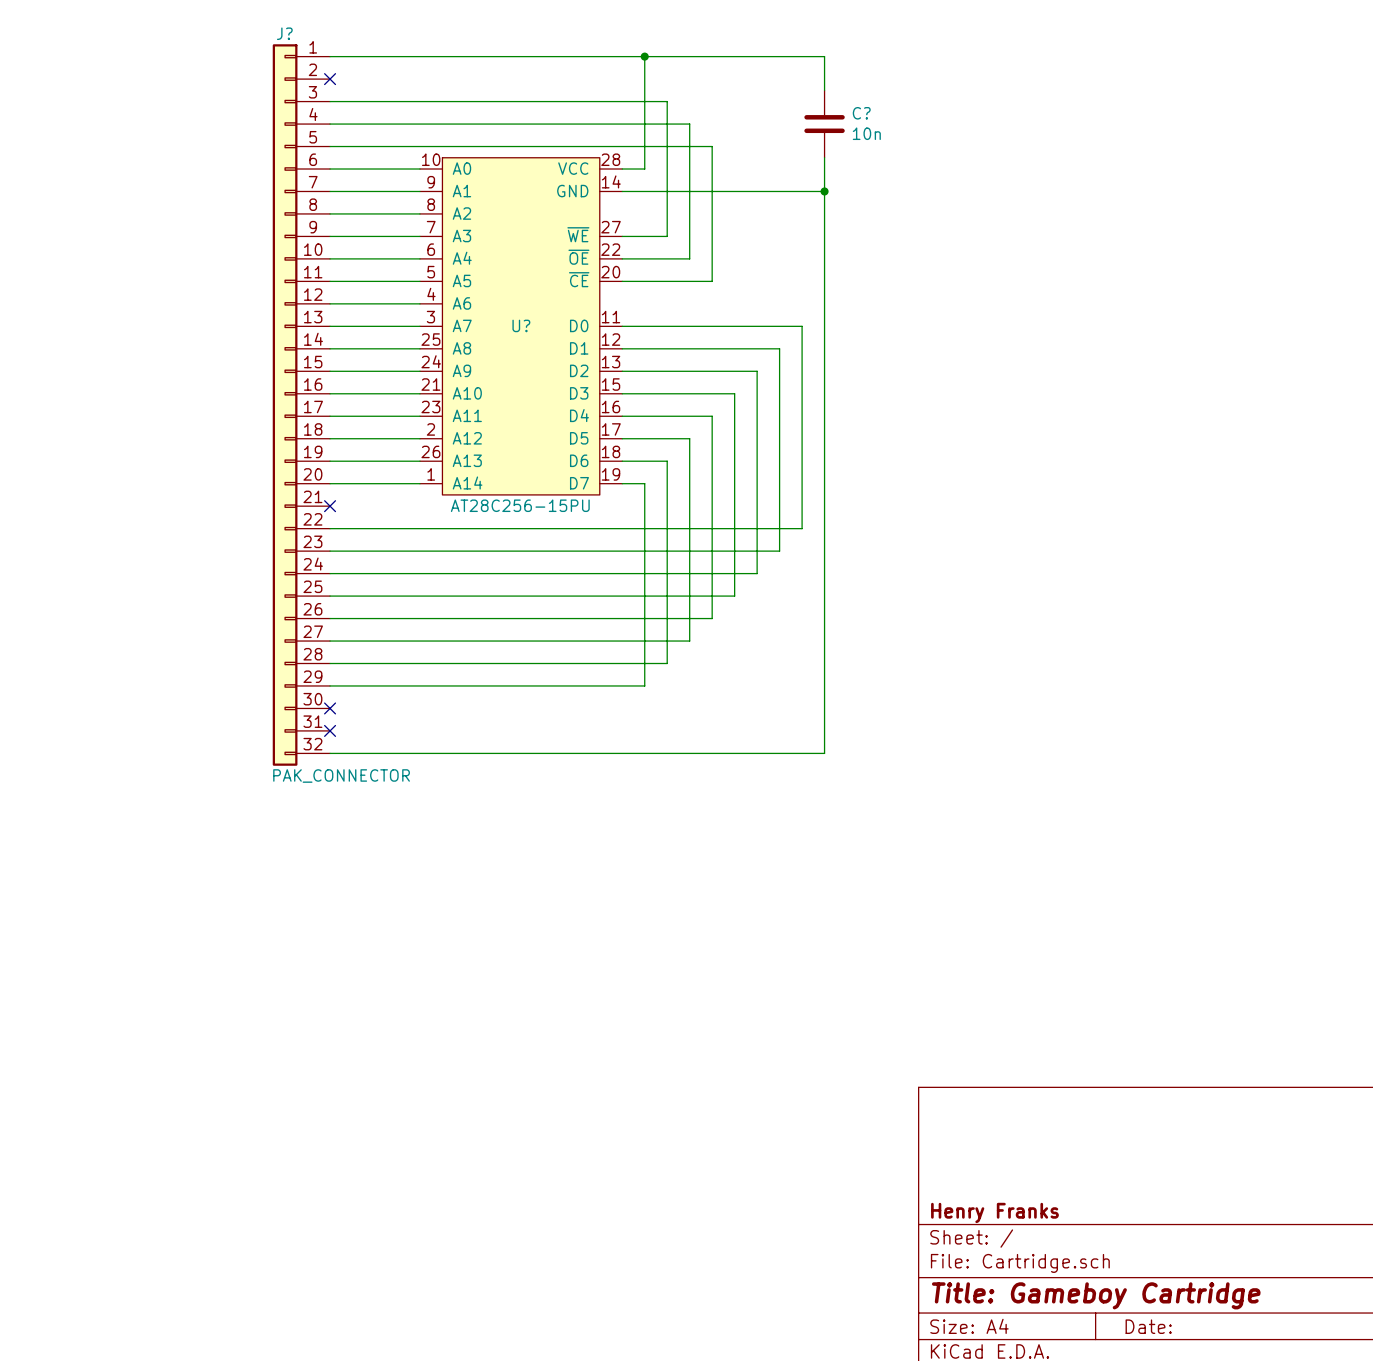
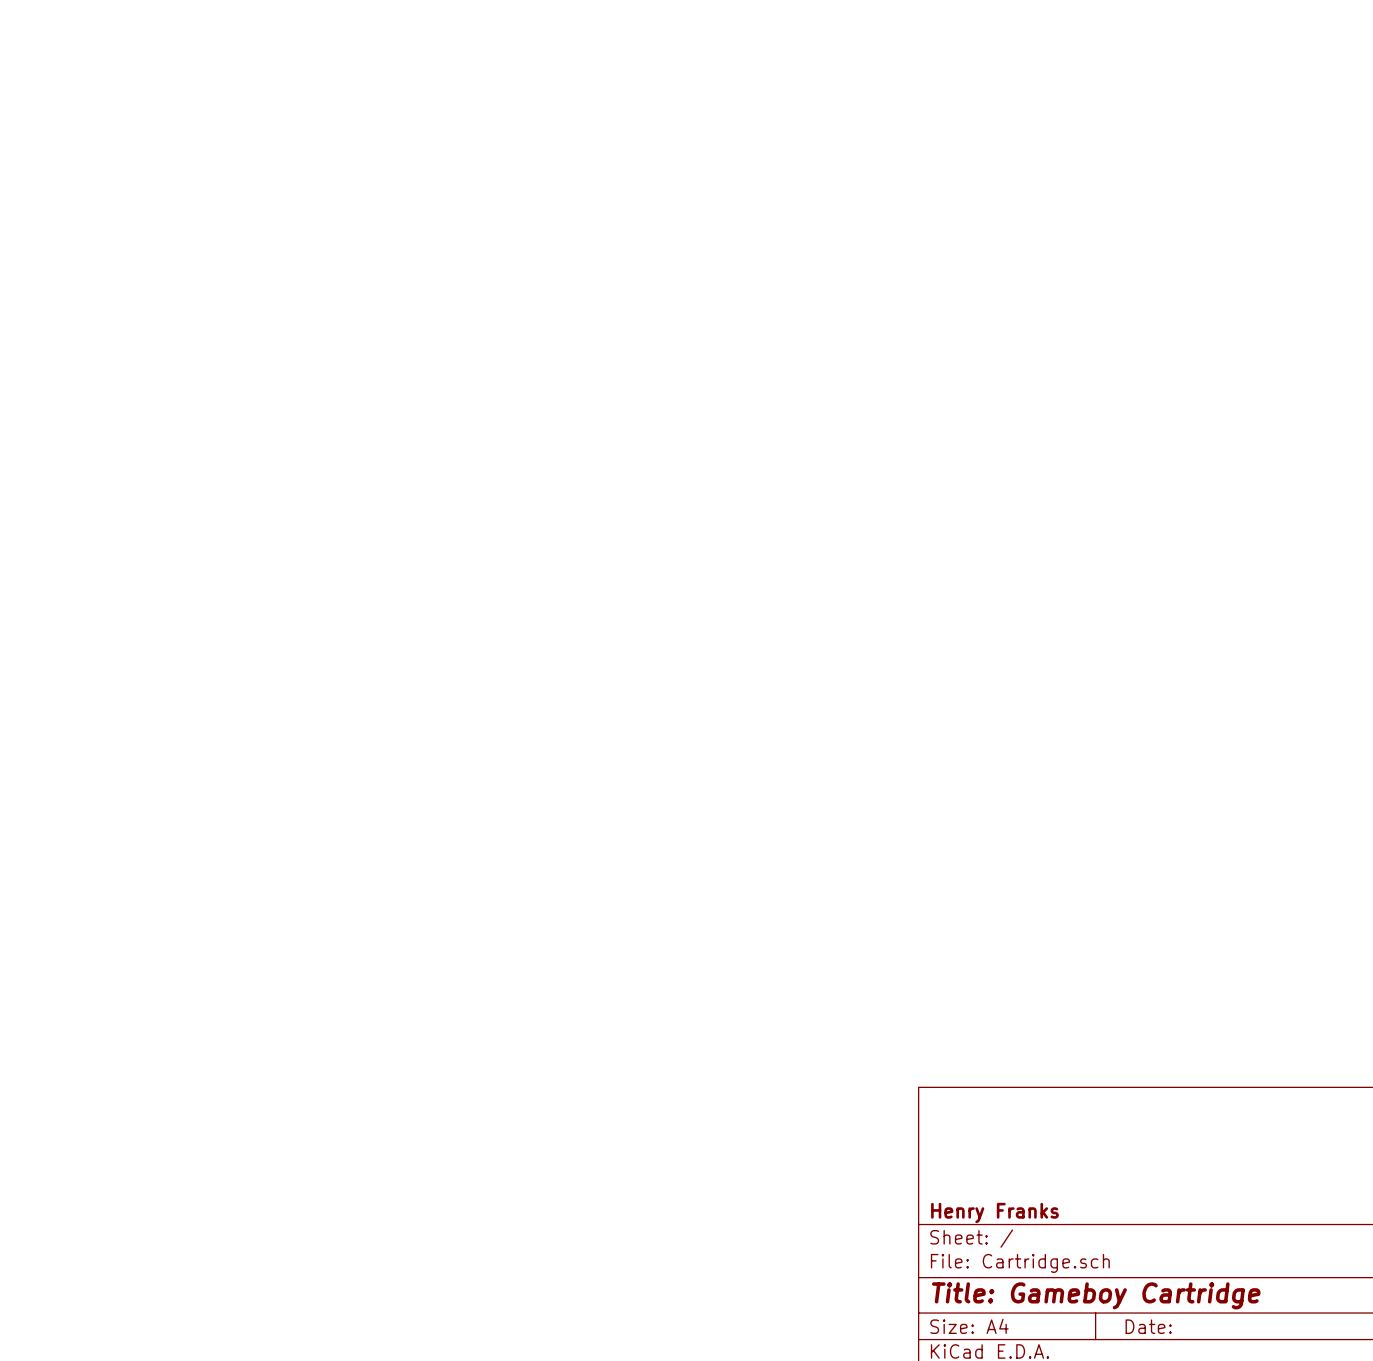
wire: (330, 56) (824, 56) (824, 90) -> none
wire: (644, 56) (644, 169) (622, 169) -> none
junction: (644, 56) -> none
no-connect mark: (330, 79) -> none
wire: (330, 101) (667, 101) (667, 236) (622, 236) -> none
wire: (330, 124) (689, 124) (689, 258) (622, 258) -> none
C?: 10n (824, 124) -> none
wire: (330, 146) (712, 146) (712, 281) (622, 281) -> none
wire: (824, 157) (824, 753) (330, 753) -> none
wire: (330, 169) (419, 169) -> none
wire: (330, 191) (419, 191) -> none
wire: (622, 191) (824, 191) -> none
junction: (824, 191) -> none
wire: (330, 213) (419, 213) -> none
wire: (330, 236) (419, 236) -> none
wire: (330, 258) (419, 258) -> none
wire: (330, 281) (419, 281) -> none
wire: (330, 303) (419, 303) -> none
wire: (330, 326) (419, 326) -> none
U?: AT28C256-15PU (521, 326) -> none
wire: (622, 326) (802, 326) (802, 528) (330, 528) -> none
wire: (330, 348) (419, 348) -> none
wire: (622, 348) (779, 348) (779, 551) (330, 551) -> none
wire: (330, 371) (419, 371) -> none
wire: (622, 371) (757, 371) (757, 573) (330, 573) -> none
wire: (330, 393) (419, 393) -> none
wire: (622, 393) (734, 393) (734, 596) (330, 596) -> none
J?: PAK_CONNECTOR (301, 405) -> none
wire: (330, 416) (419, 416) -> none
wire: (622, 416) (712, 416) (712, 618) (330, 618) -> none
wire: (330, 438) (419, 438) -> none
wire: (622, 438) (689, 438) (689, 641) (330, 641) -> none
wire: (330, 461) (419, 461) -> none
wire: (622, 461) (667, 461) (667, 663) (330, 663) -> none
wire: (330, 483) (419, 483) -> none
wire: (622, 483) (644, 483) (644, 685) (330, 685) -> none
no-connect mark: (330, 506) -> none
no-connect mark: (330, 708) -> none
no-connect mark: (330, 730) -> none

